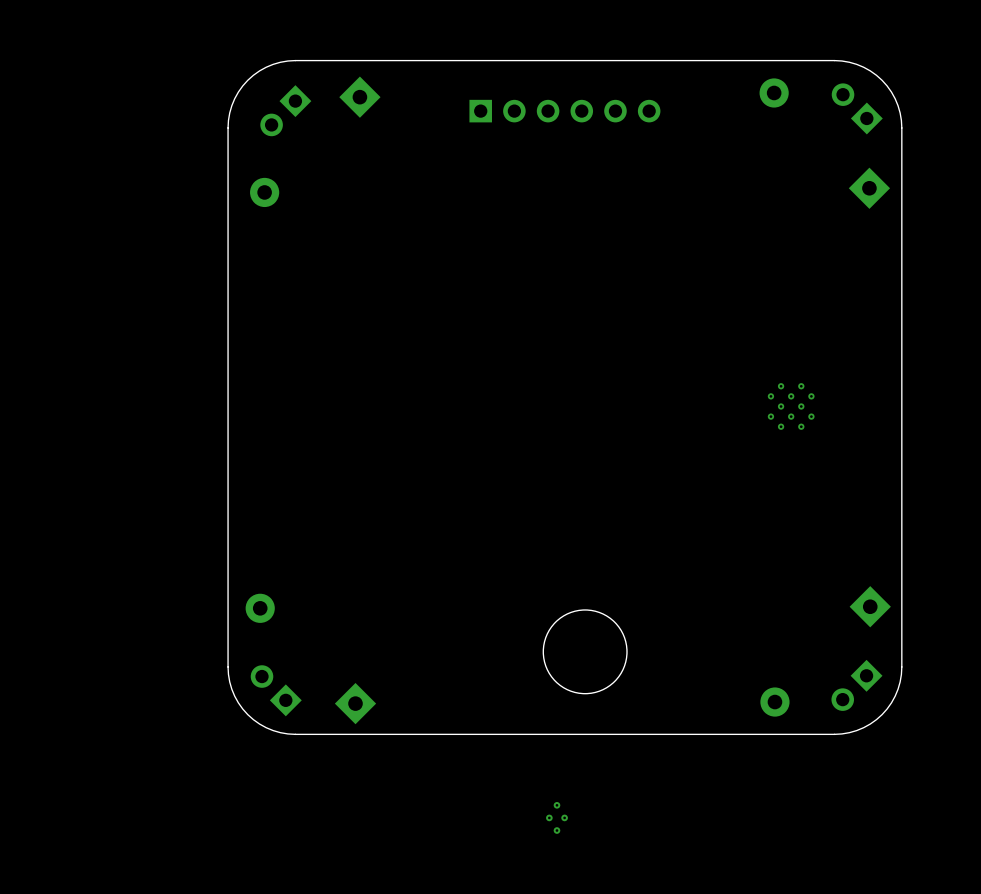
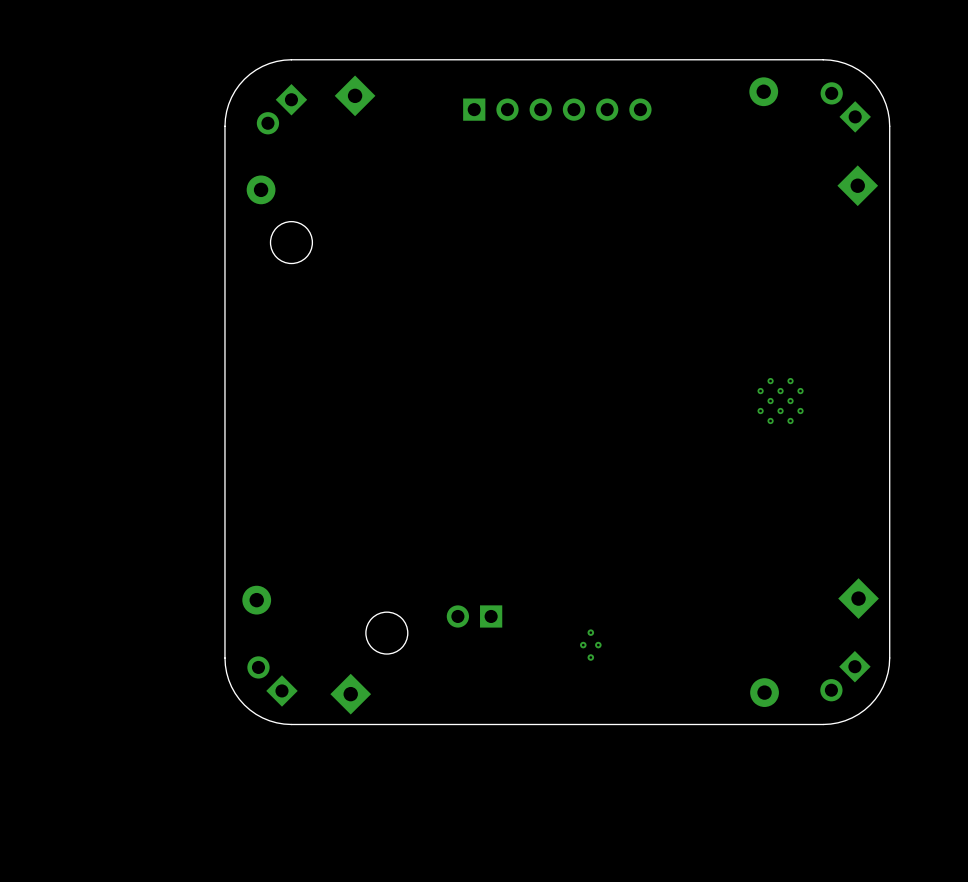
round board edge: none -> [269, 220, 314, 265]
round board edge: [542, 609, 628, 695] -> none
round board edge: none -> [365, 611, 409, 655]
part: none -> (474, 616)
part position: (556, 817) -> (590, 645)

